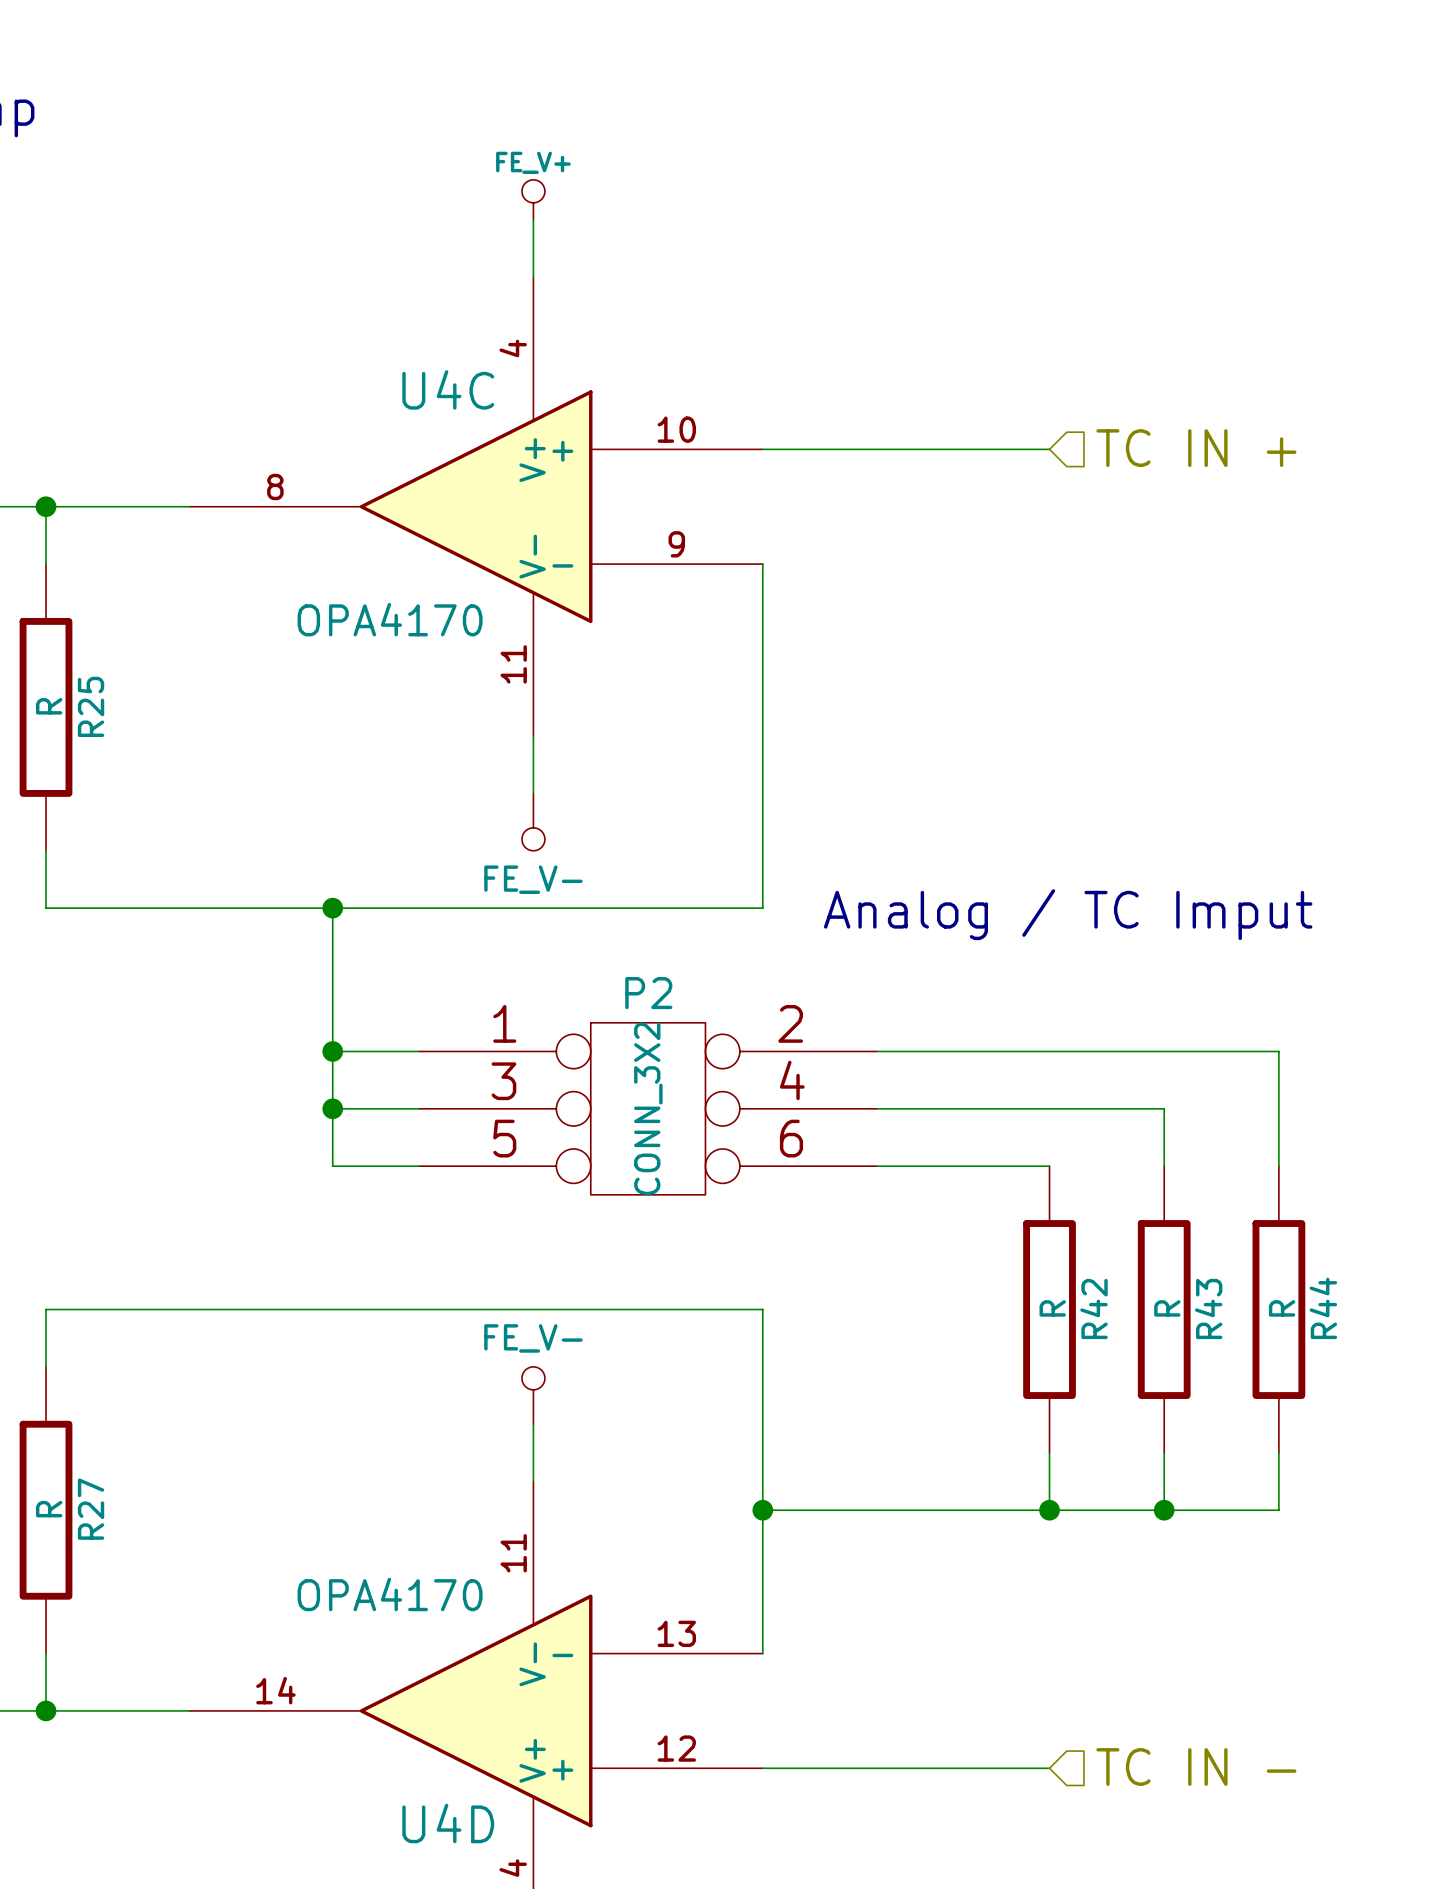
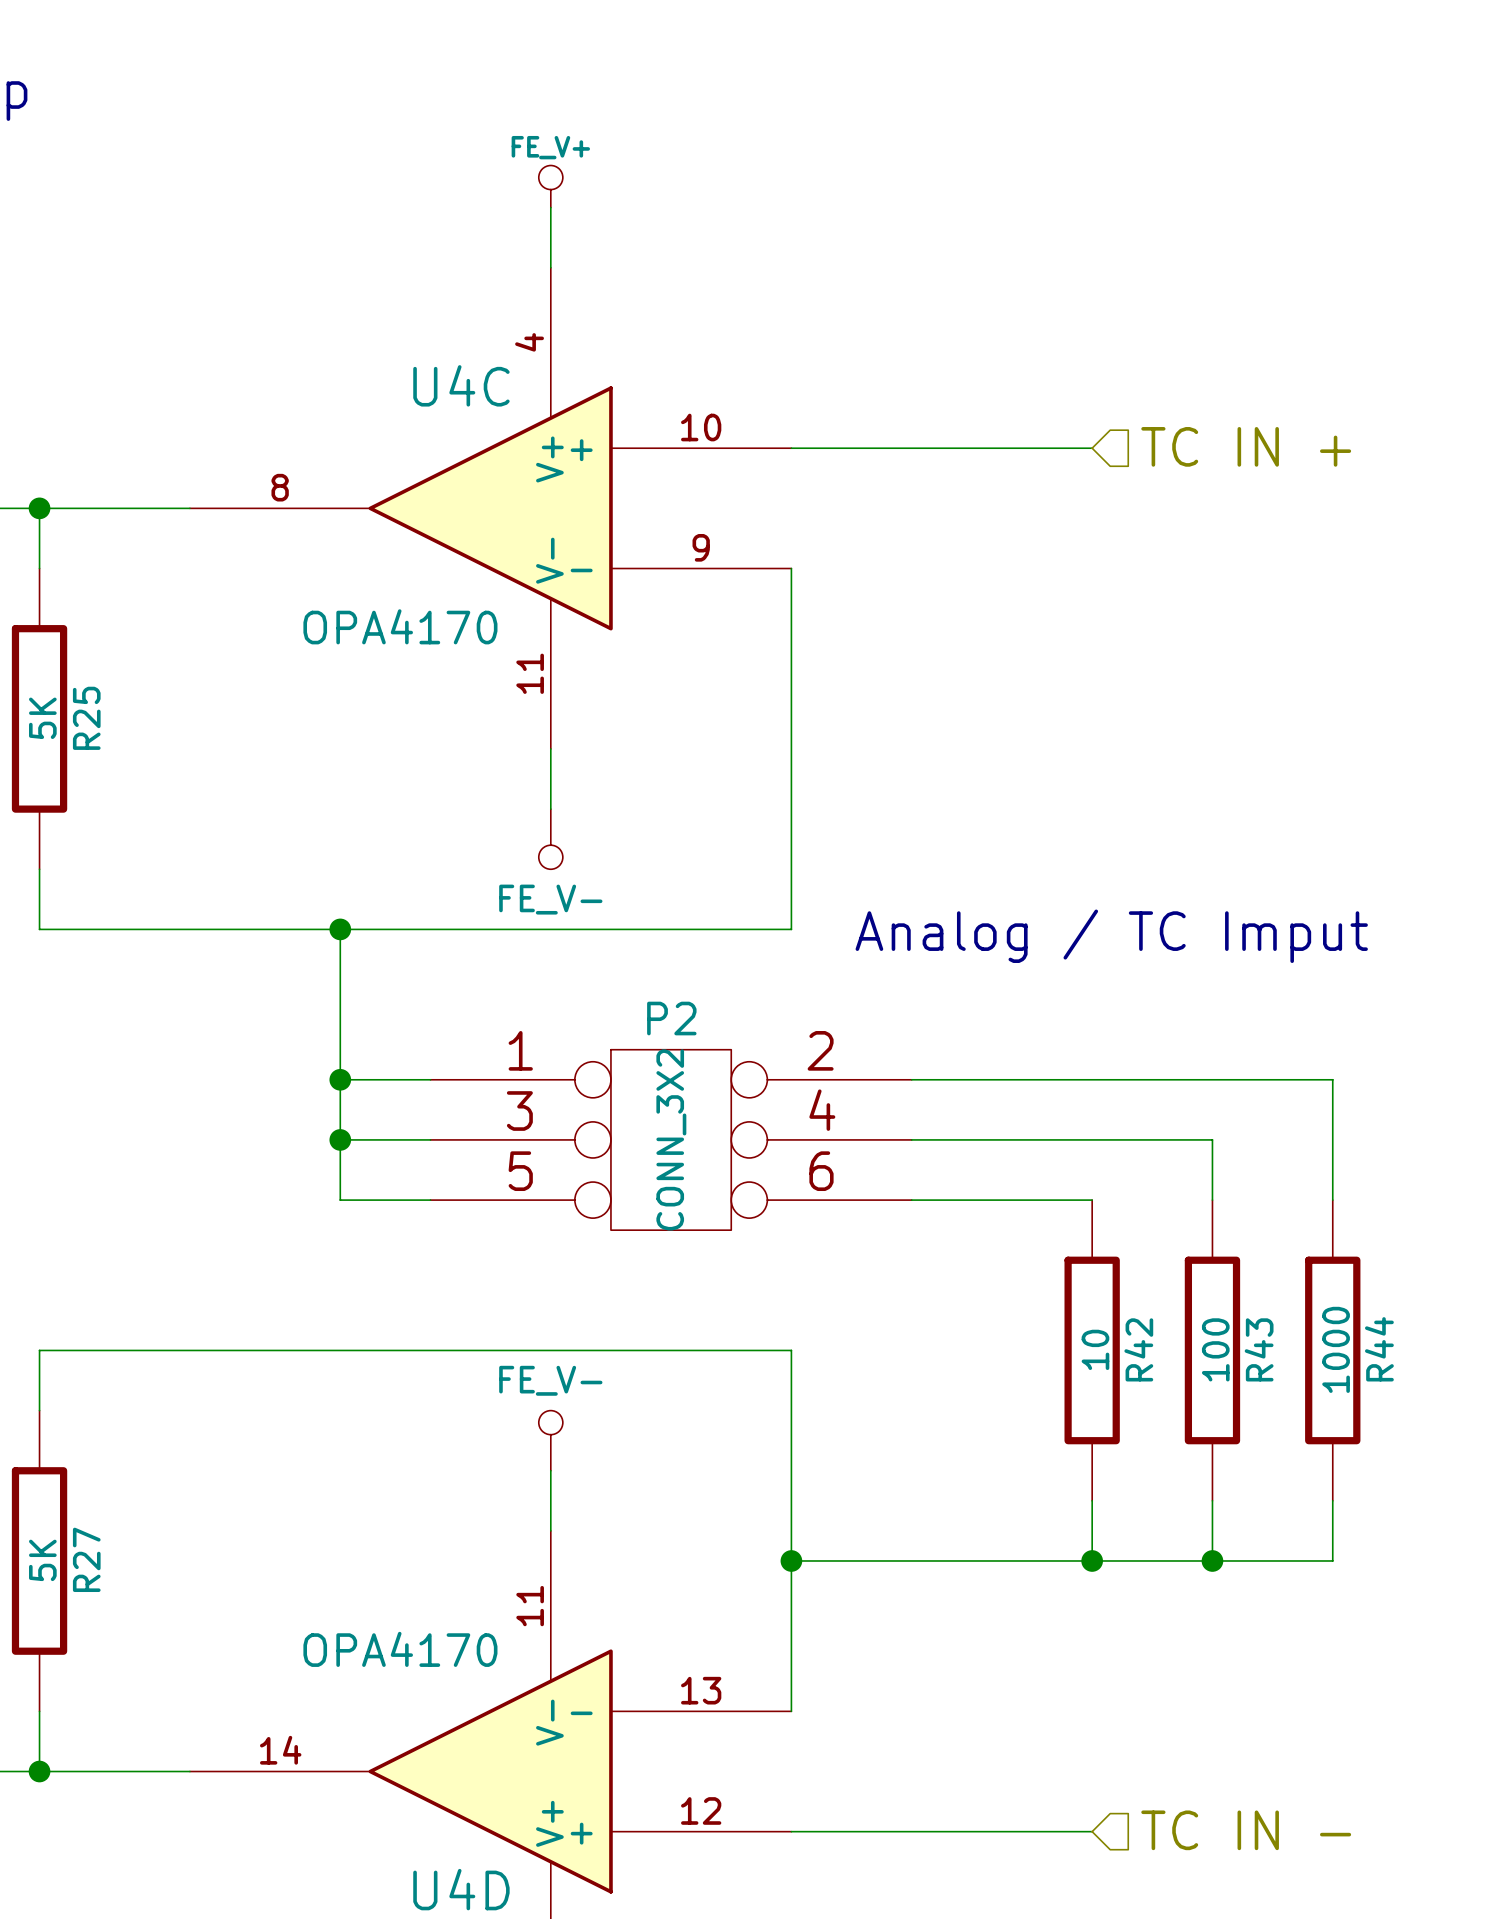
R25 value: R (49, 706) -> 5K (42, 718)
R42 value: R (1052, 1308) -> 10 (1095, 1349)
R43 value: R (1167, 1308) -> 100 (1215, 1349)
R44 value: R (1282, 1308) -> 1000 (1336, 1349)
R27 value: R (49, 1509) -> 5K (42, 1560)

